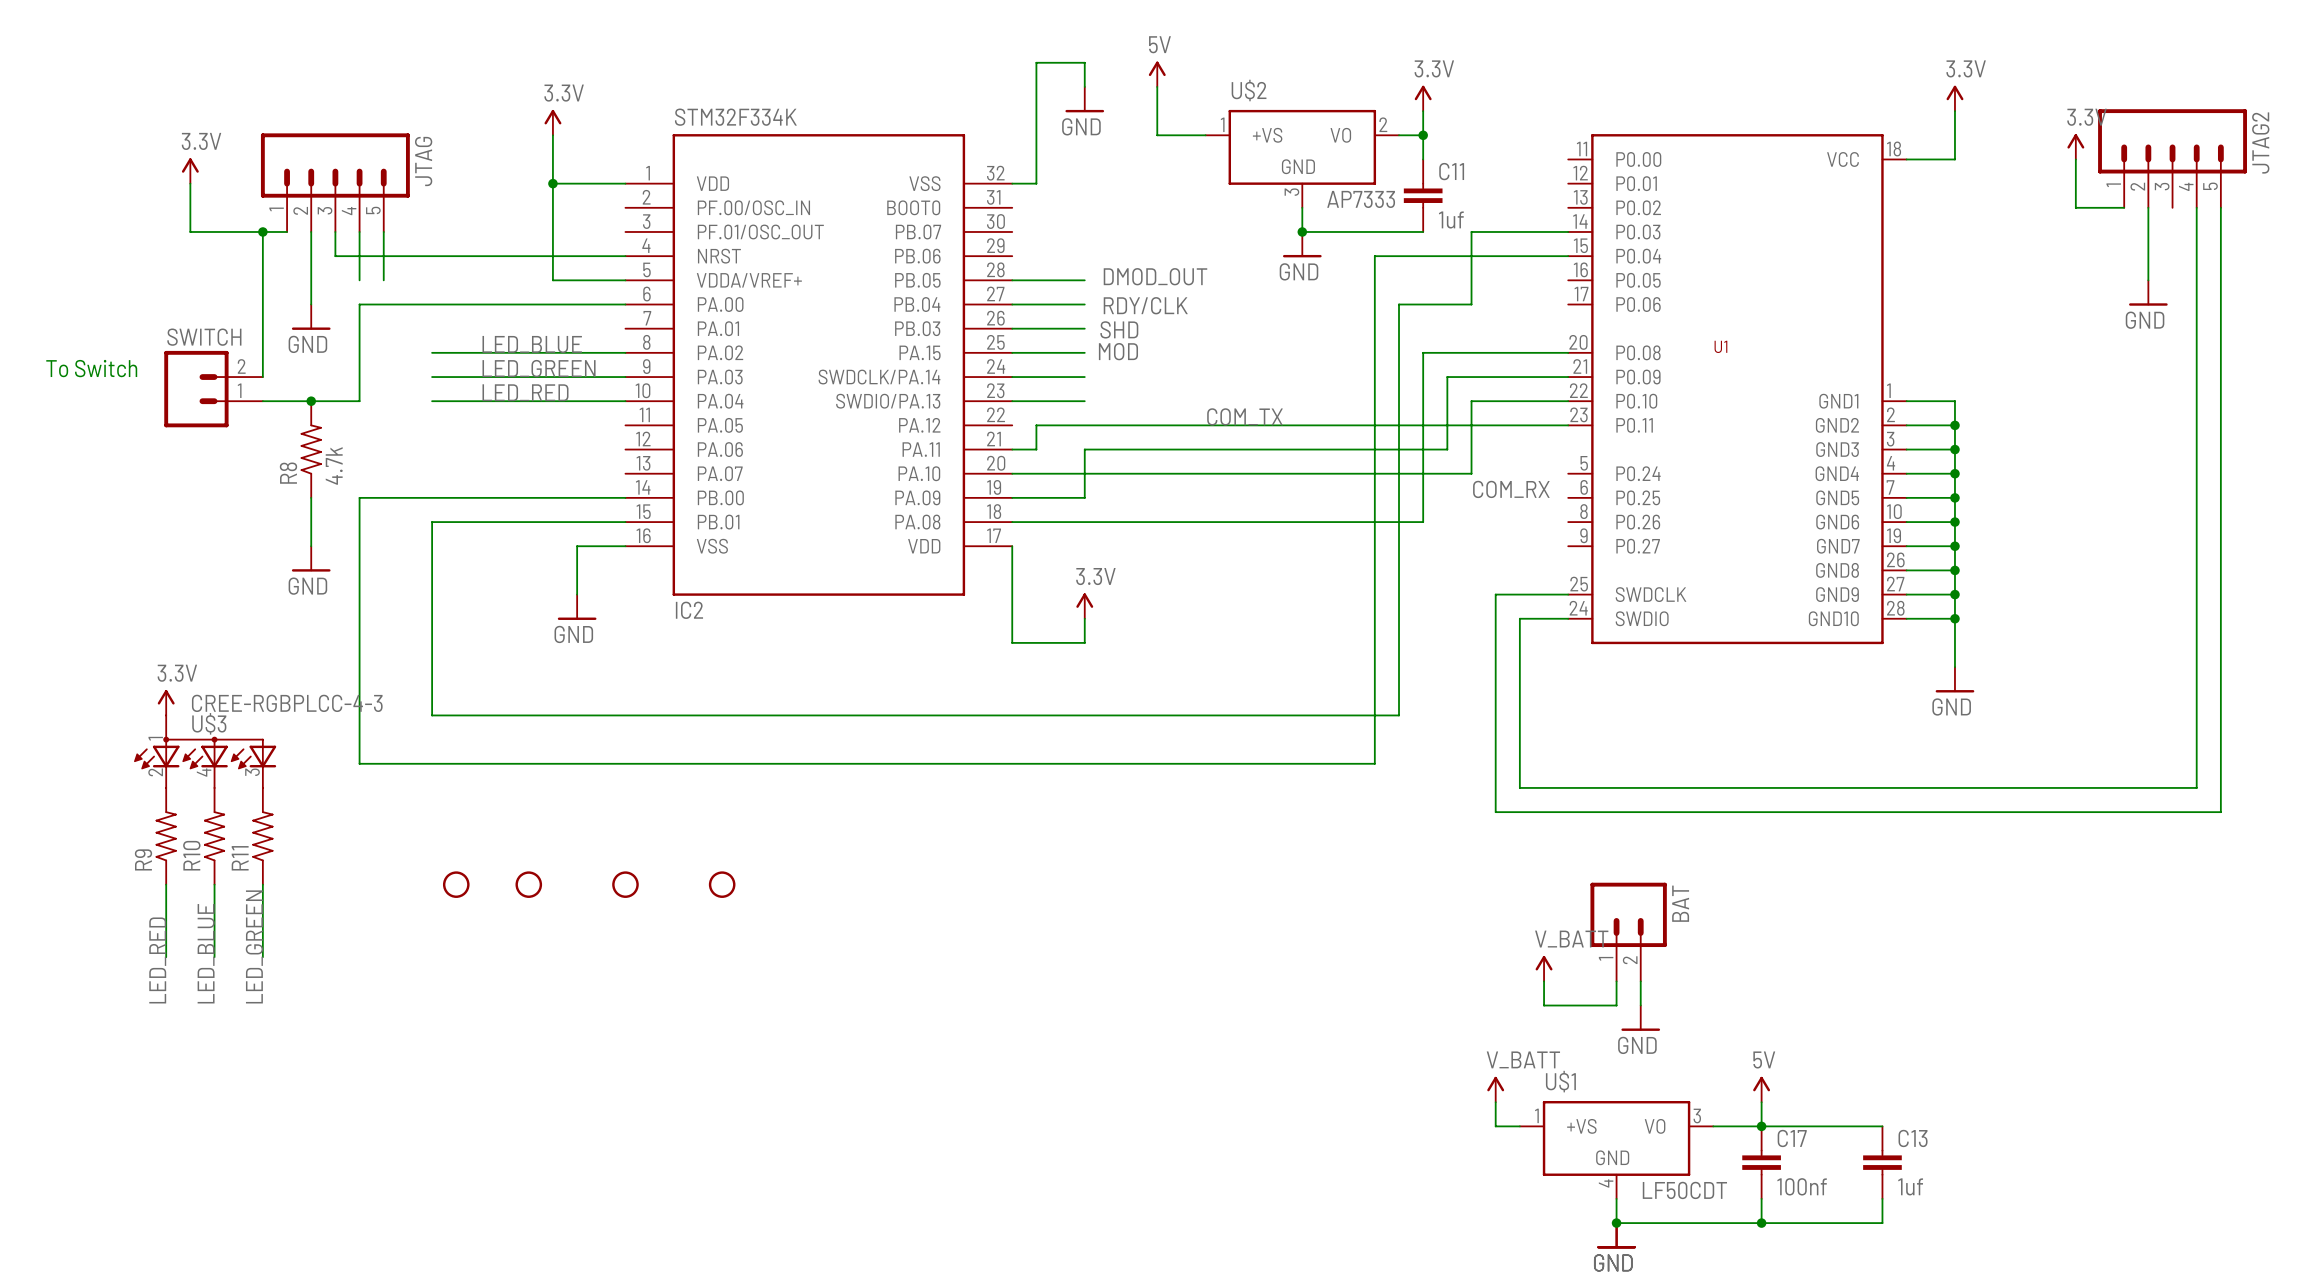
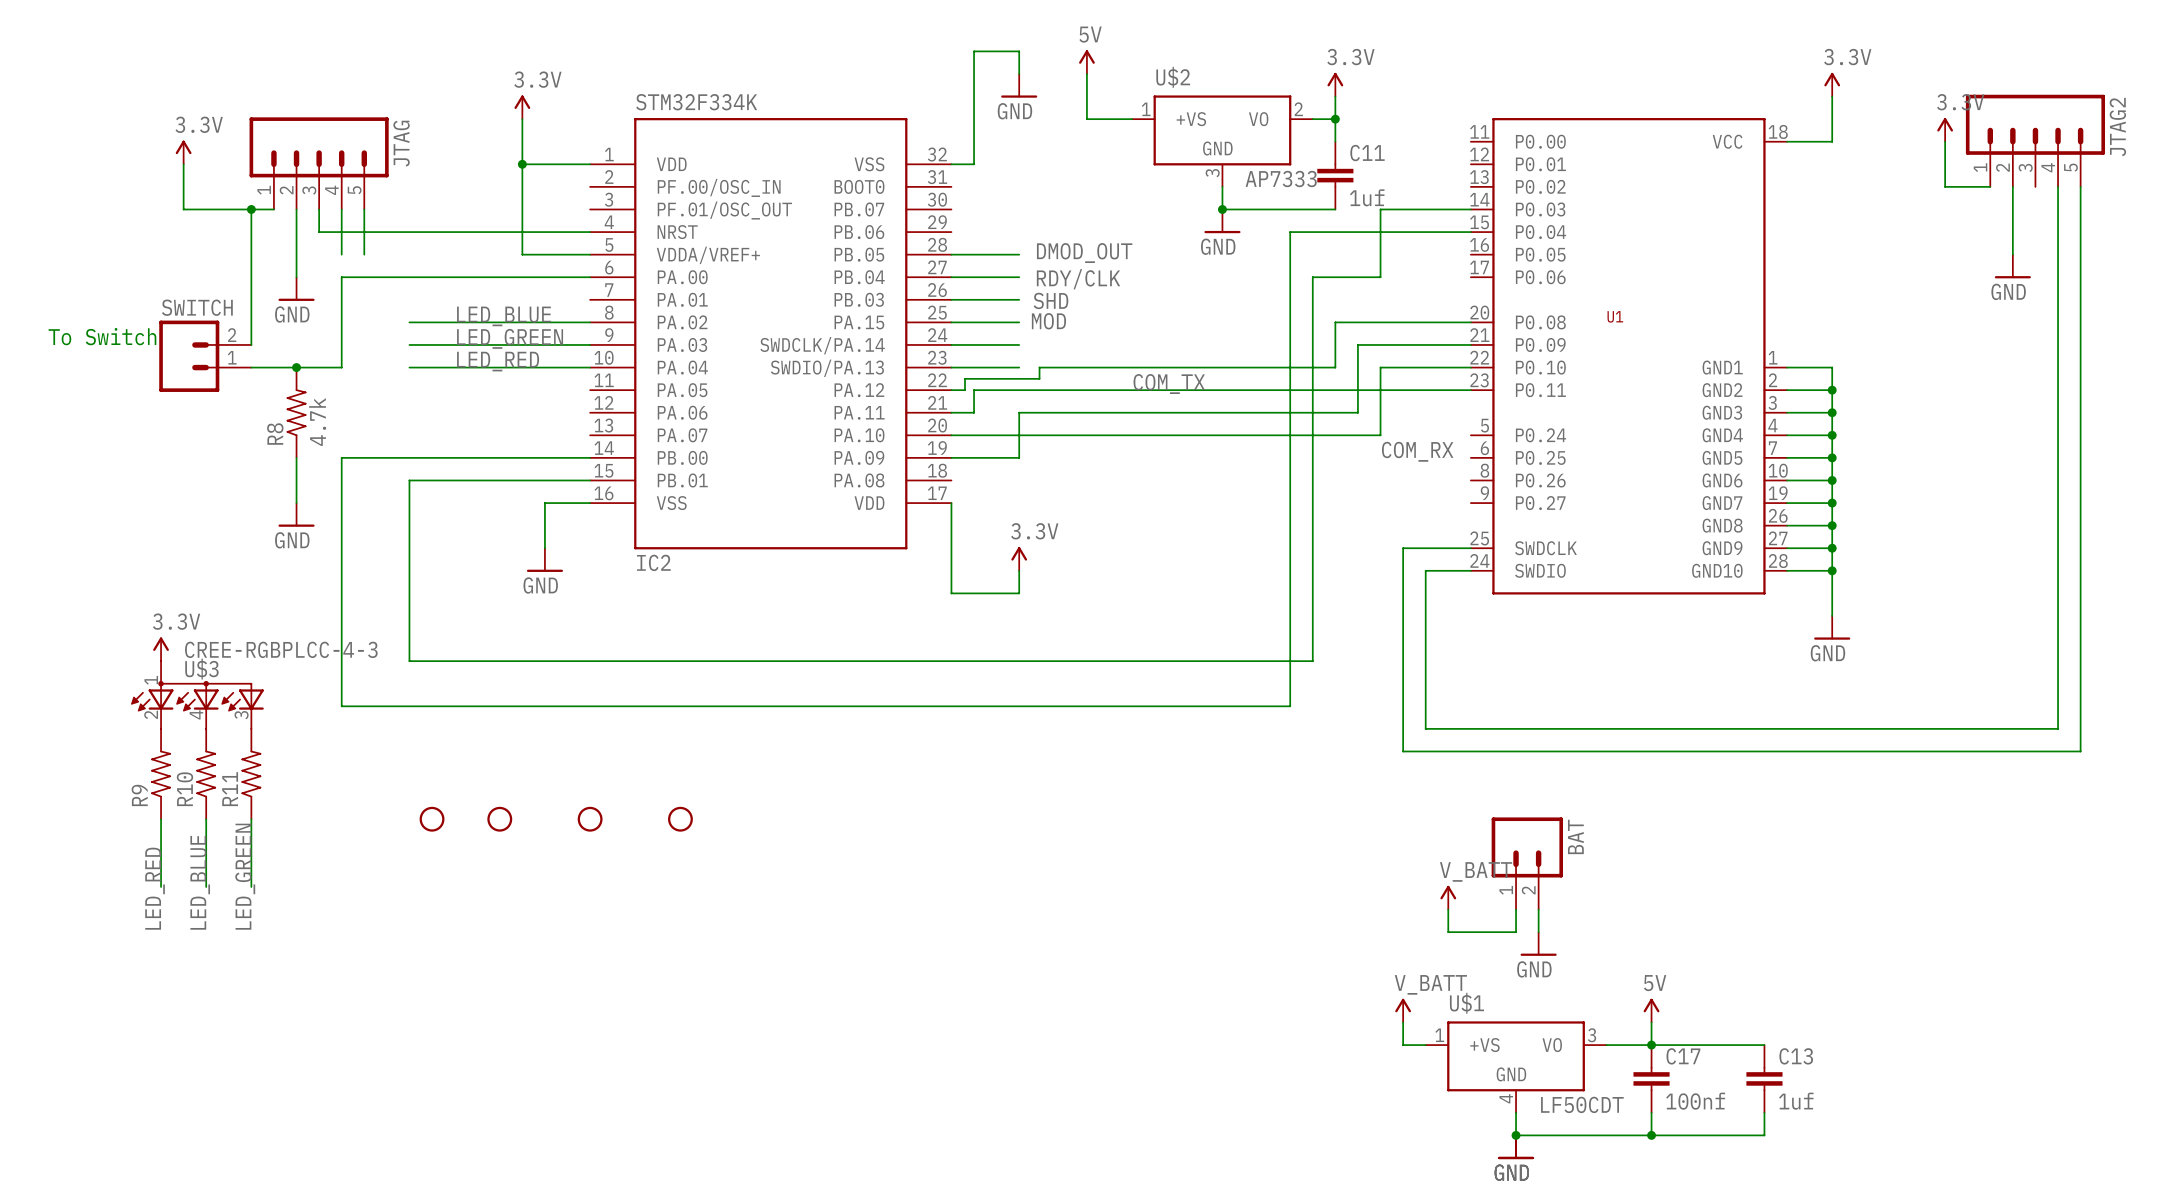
wire: (1423, 401) (1423, 522) (1012, 522) -> (1335, 367) (1039, 367) (1039, 378) (965, 378) (965, 390) (951, 390)

